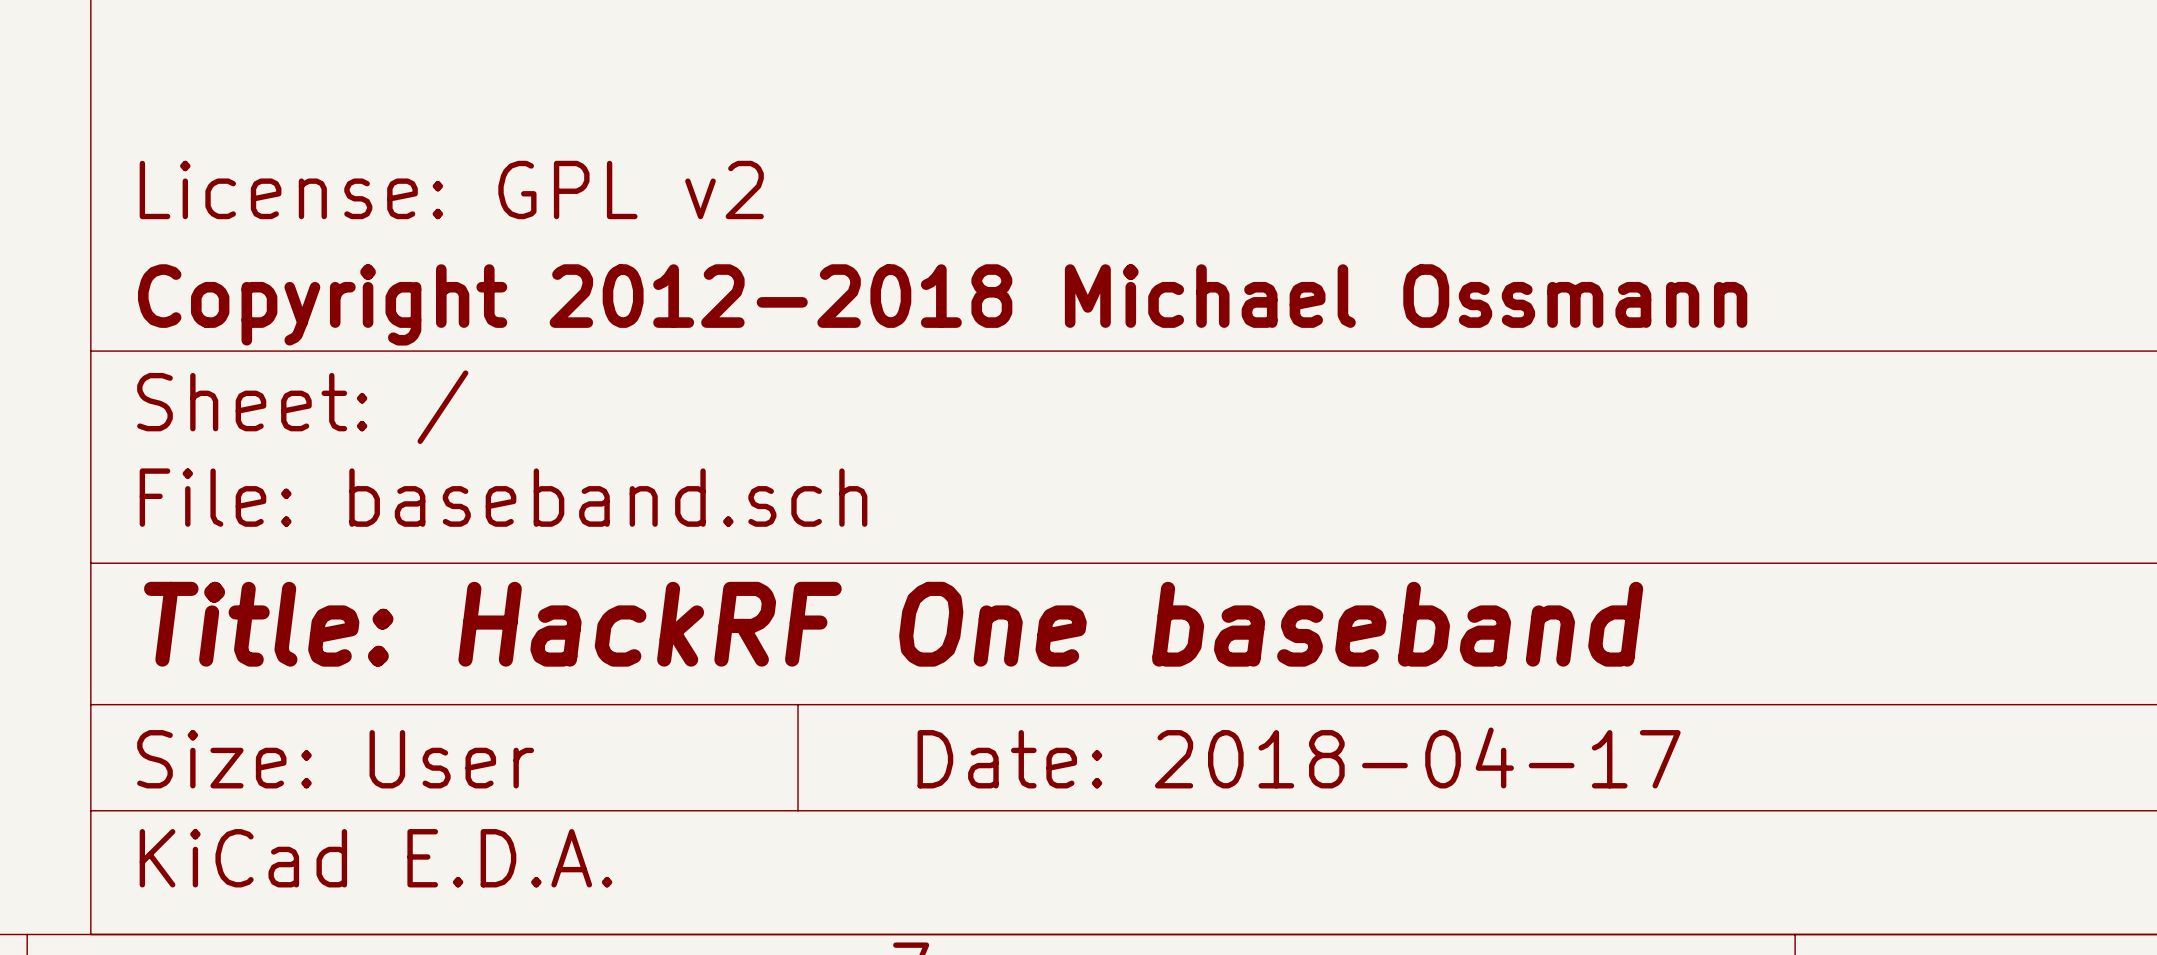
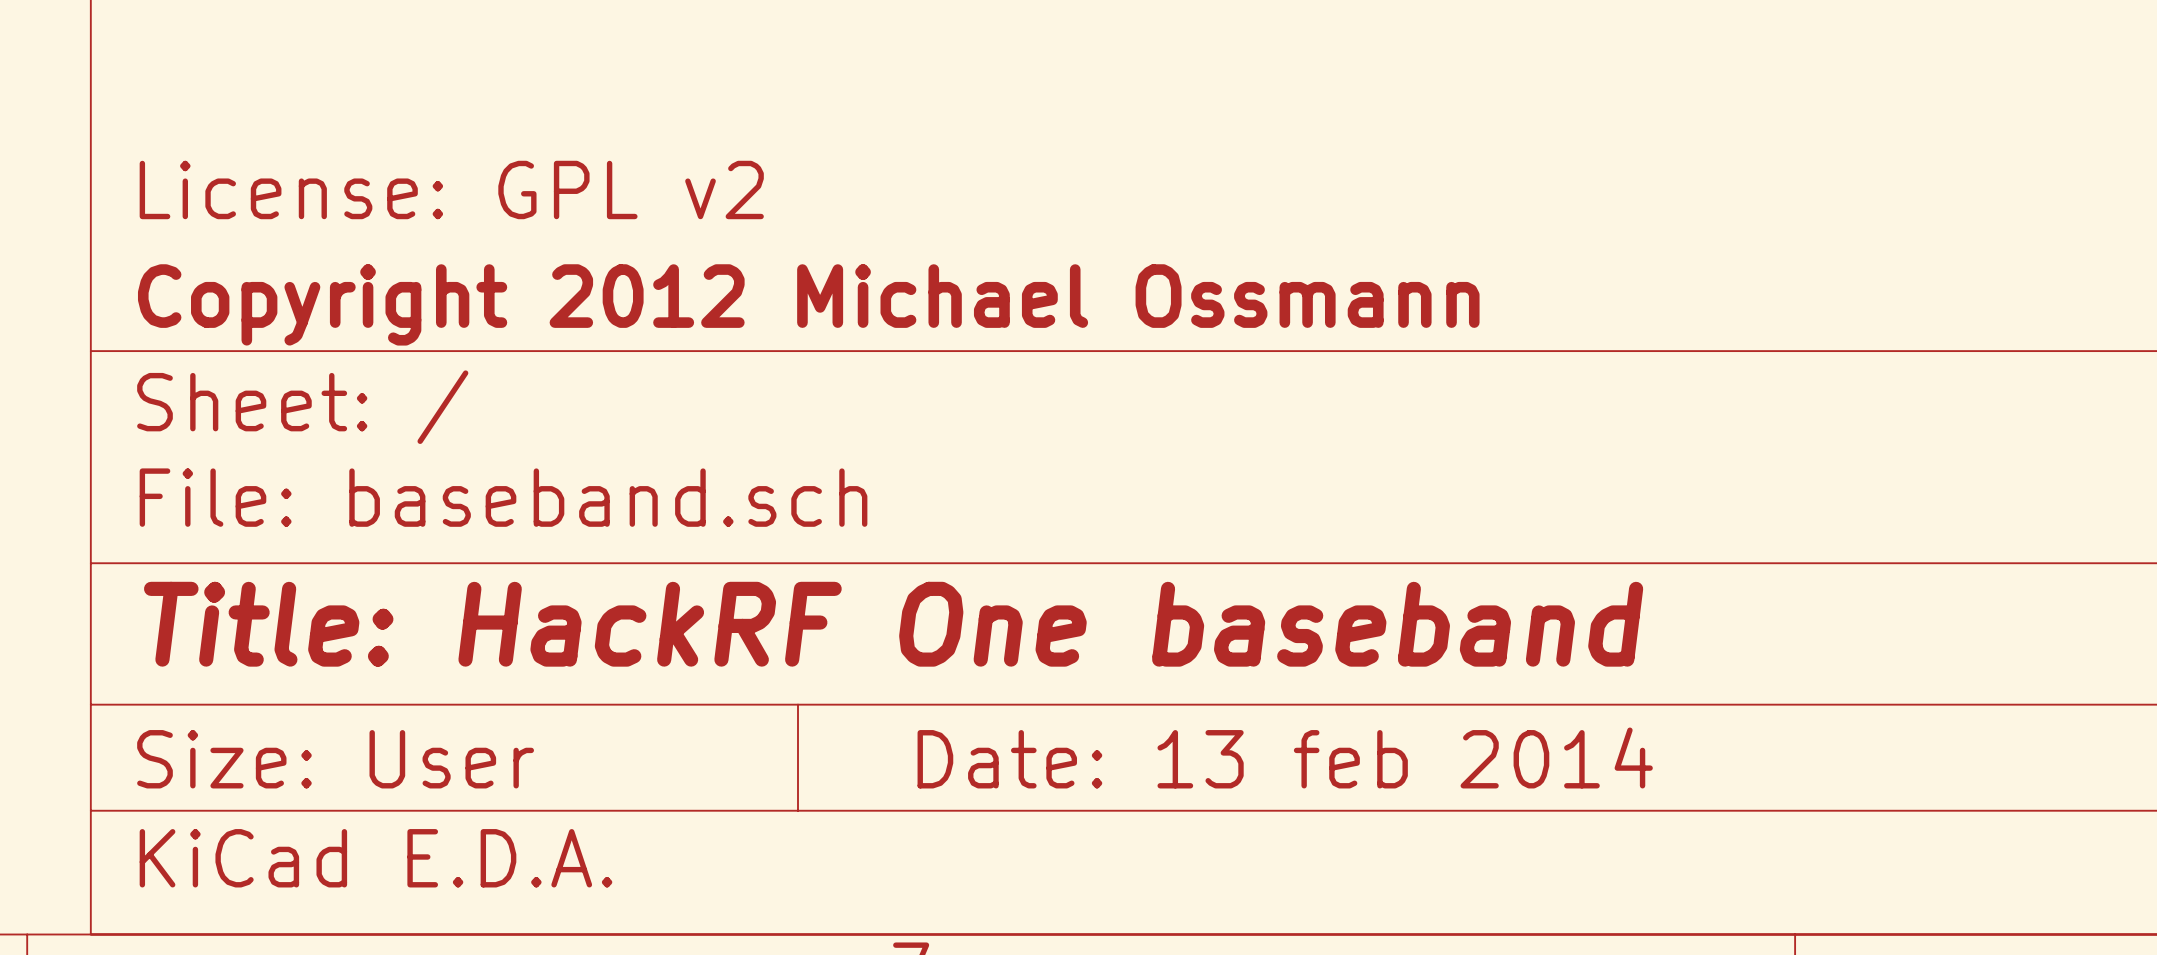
title block: Copyright 2012-2018 Michael Ossmann (942, 304) -> Copyright 2012 Michael Ossmann (808, 304)
title block: Date: 2018-04-17 (1299, 757) -> Date: 13 feb 2014 (1285, 757)

